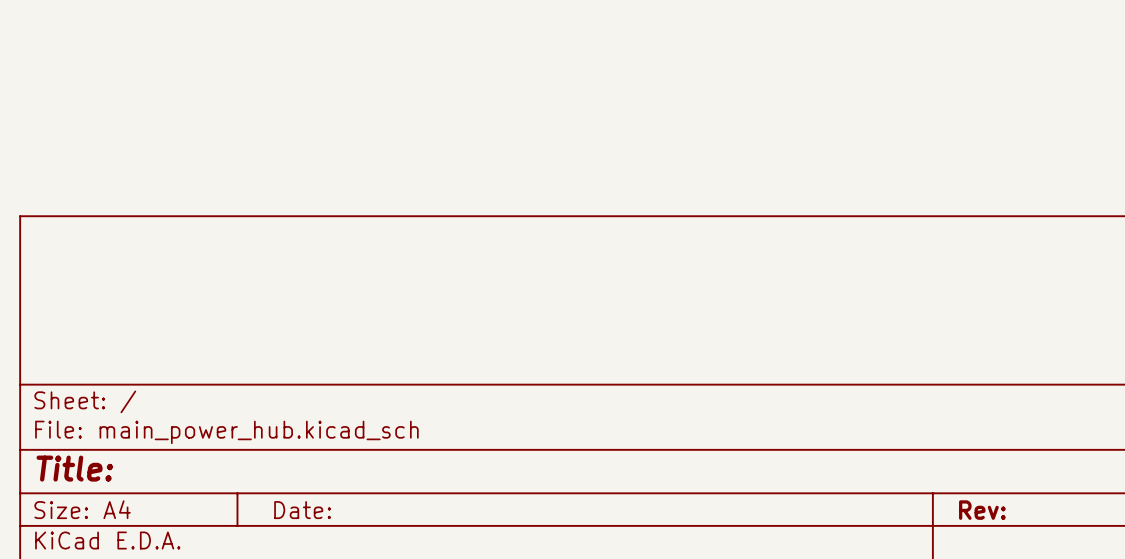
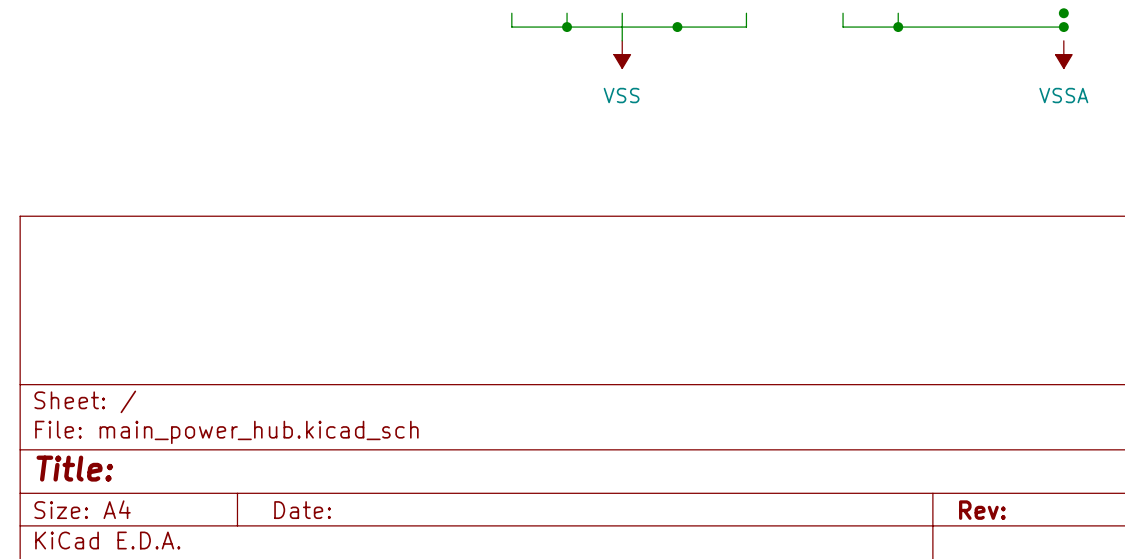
wire: none -> (511, 13) (511, 27) (746, 27) (746, 13)
wire: none -> (567, 13) (567, 27)
wire: none -> (622, 13) (622, 40)
wire: none -> (843, 13) (843, 27) (1063, 27)
wire: none -> (898, 13) (898, 27)
junction: none -> (1063, 13)
junction: none -> (567, 27)
junction: none -> (677, 27)
junction: none -> (898, 27)
junction: none -> (1063, 27)
power symbol: none -> VSS (622, 54)
power symbol: none -> VSSA (1063, 54)

